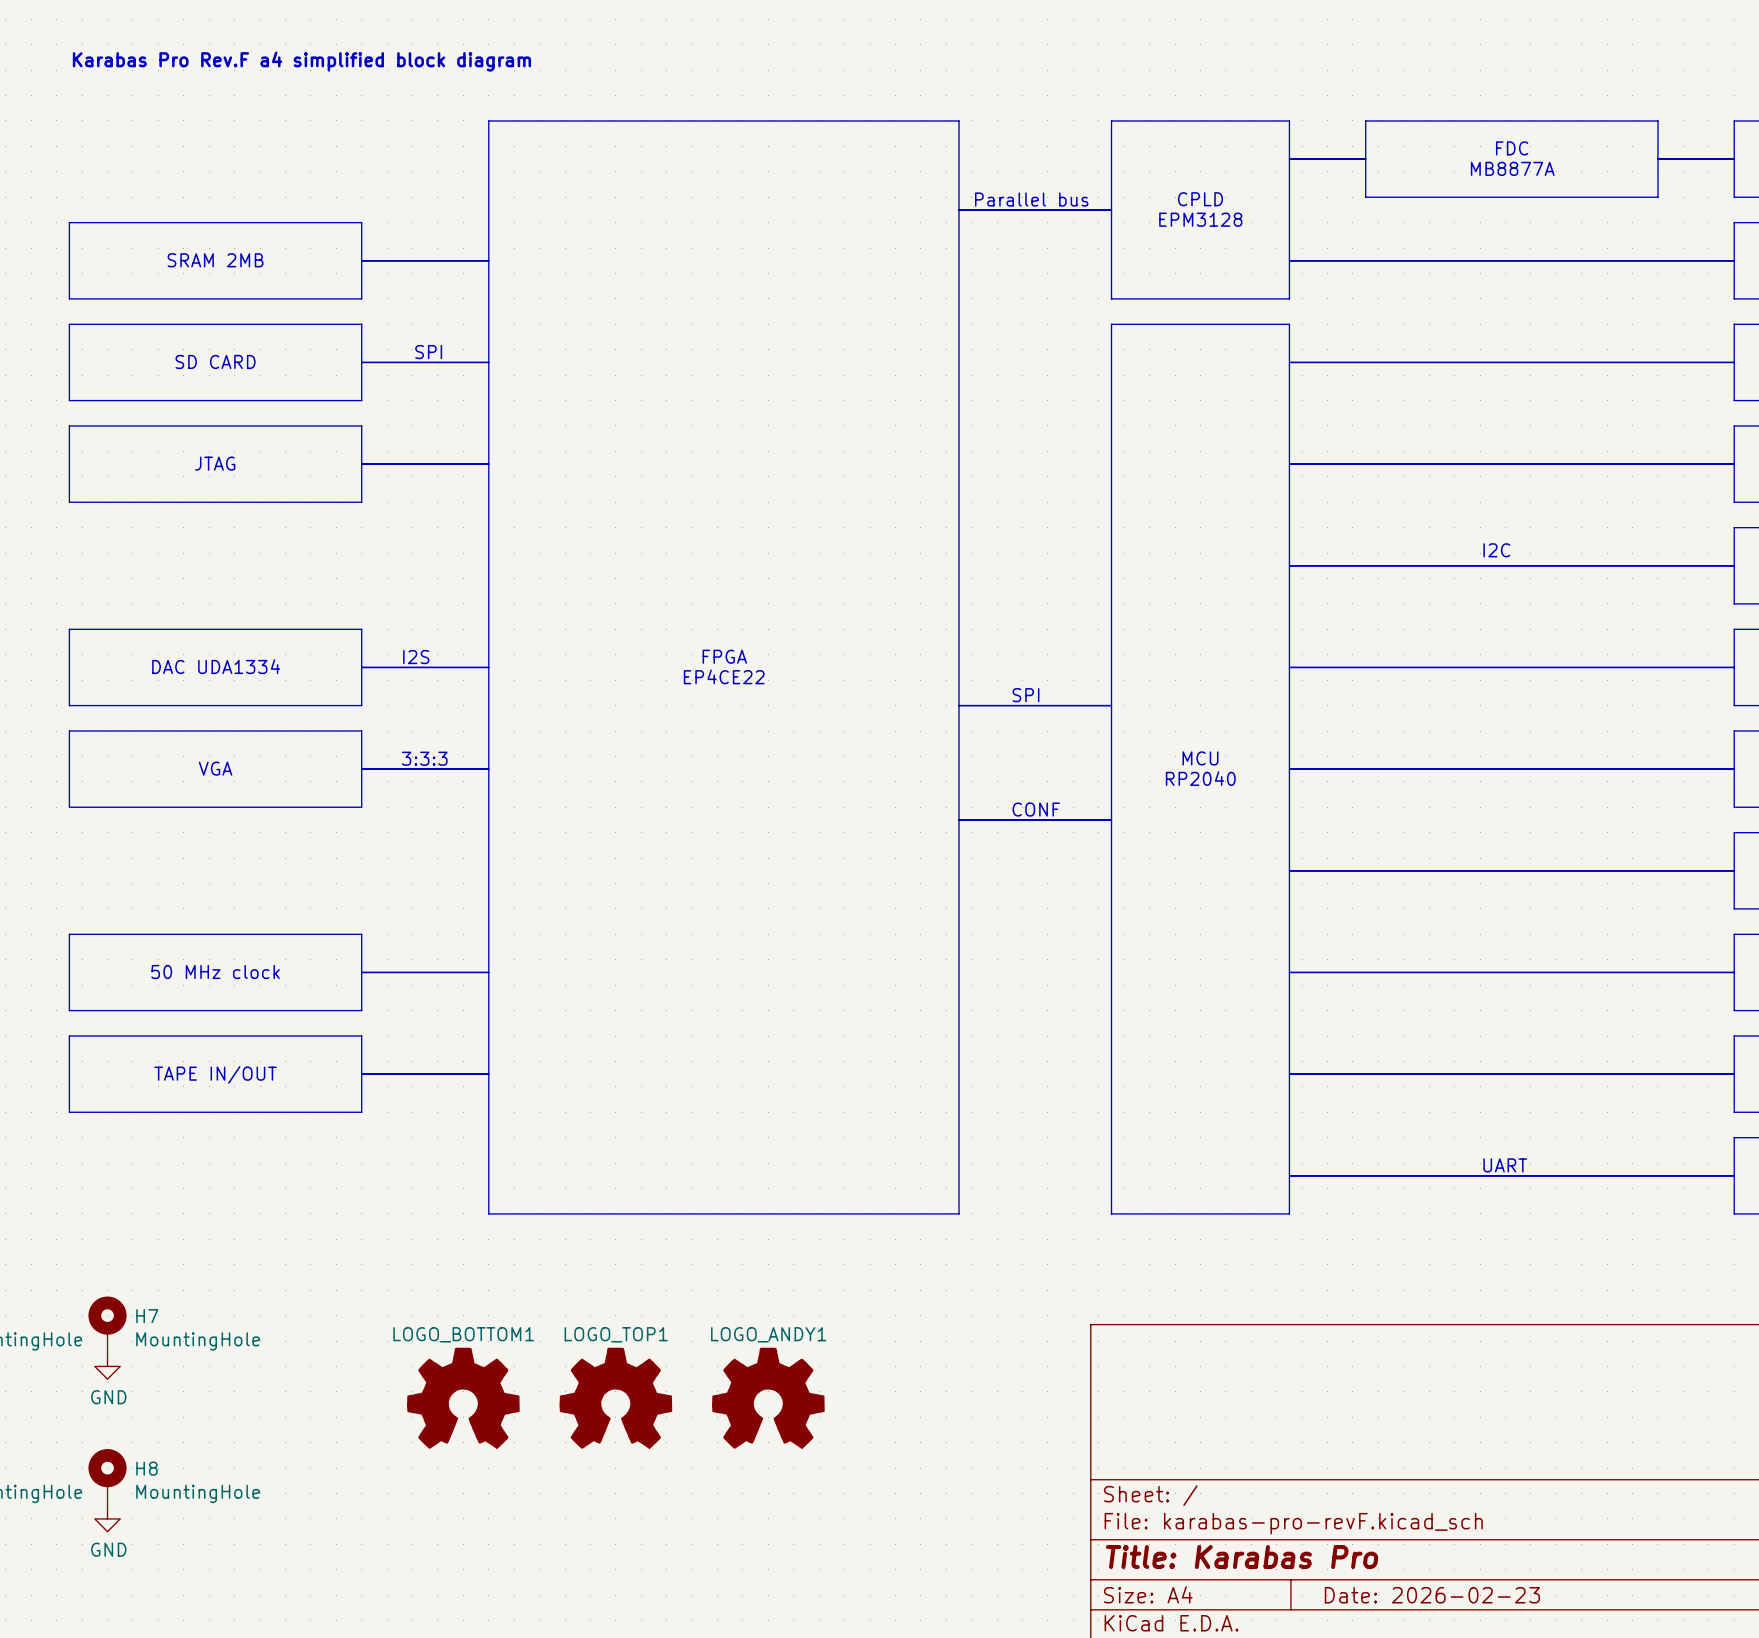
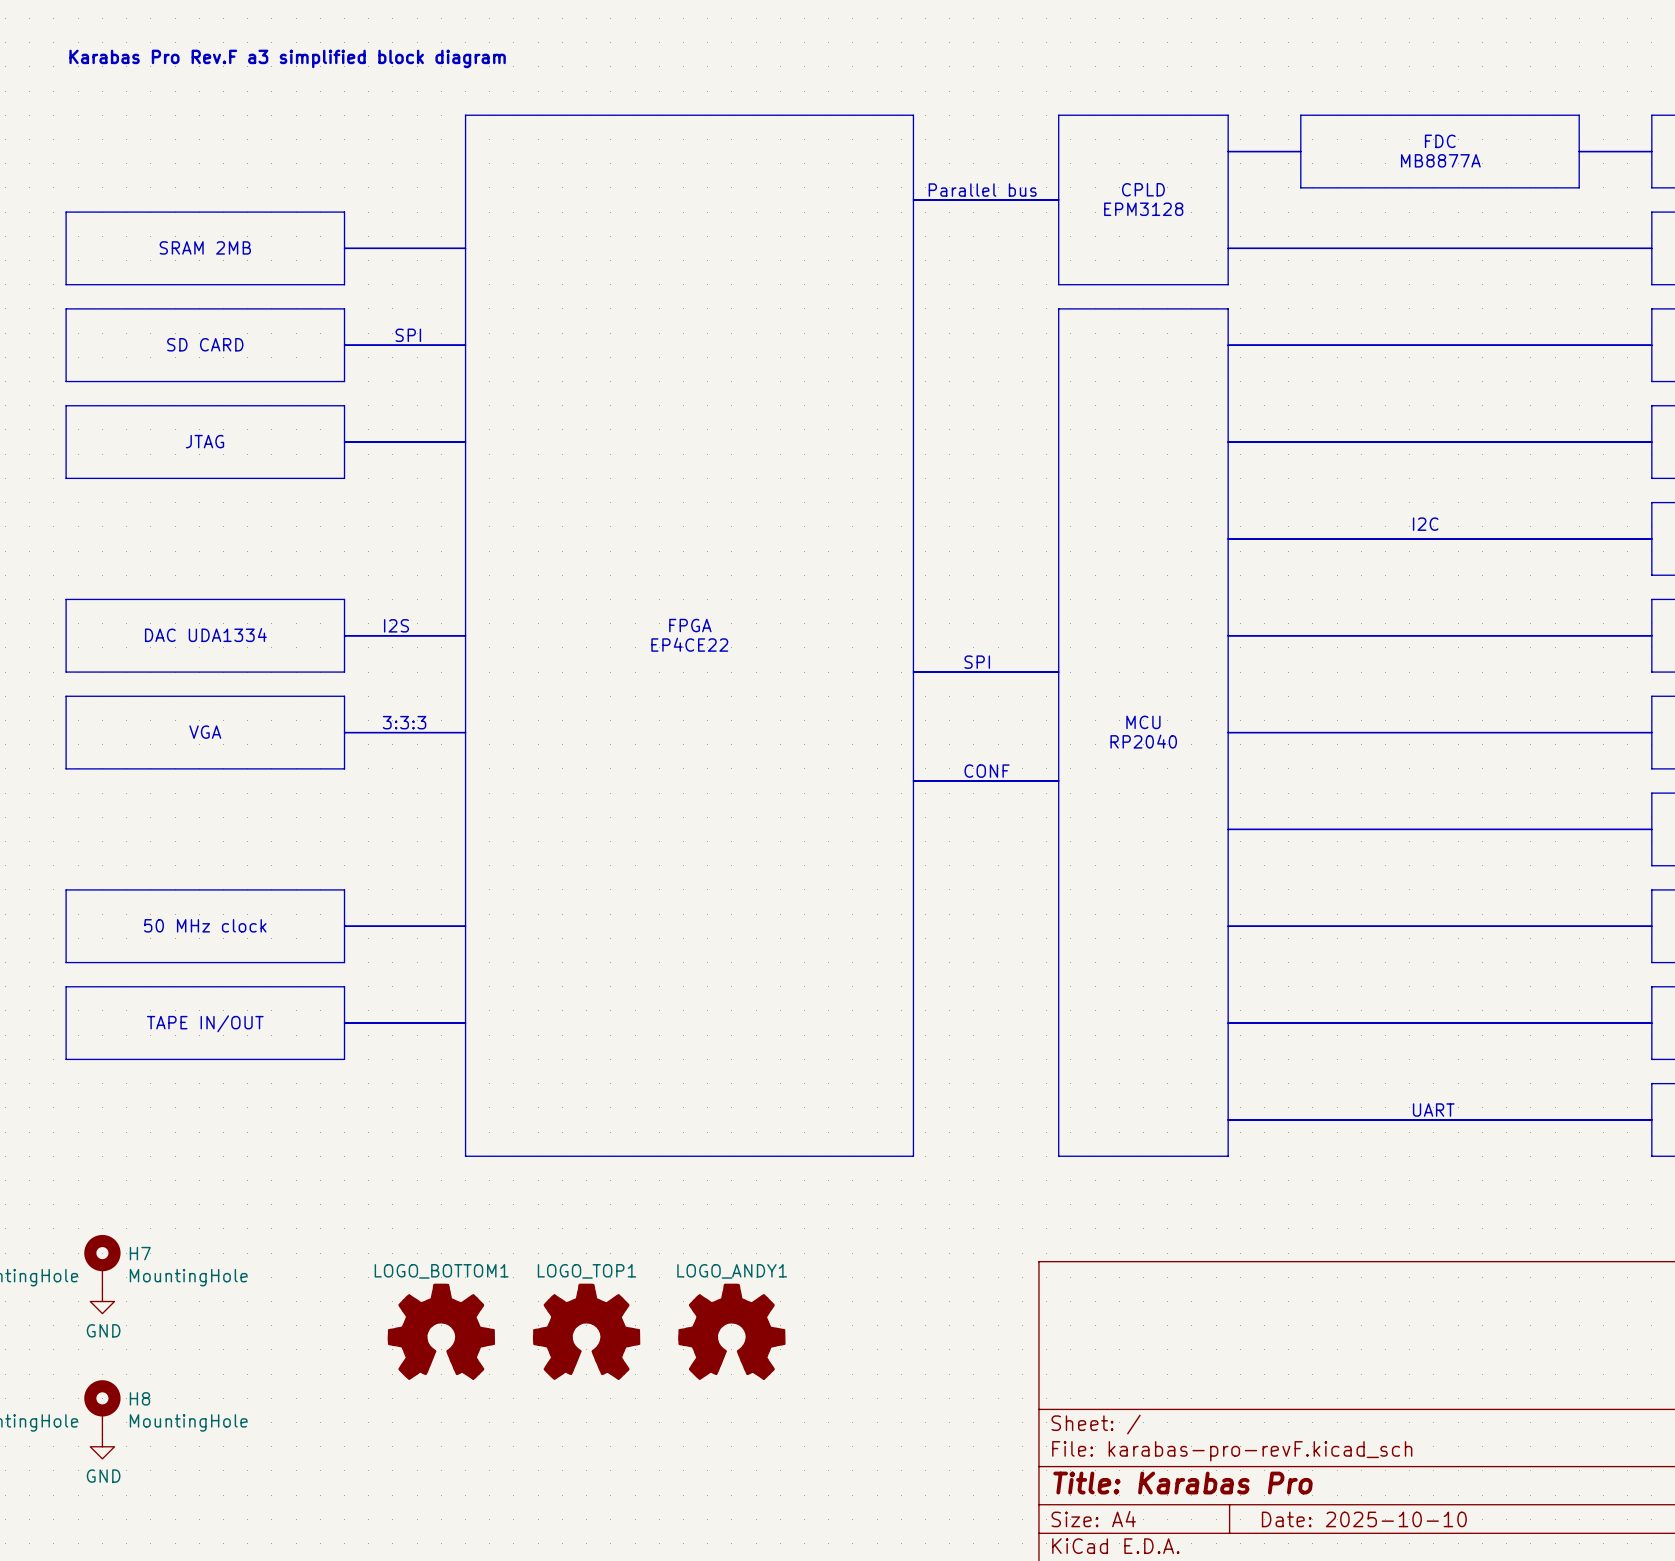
text: Karabas Pro Rev.F a4 simplified block diagram (301, 61) -> Karabas Pro Rev.F a3 simplified block diagram (287, 58)
title block: Date: 2026-02-23 (1432, 1595) -> Date: 2025-10-10 (1364, 1519)

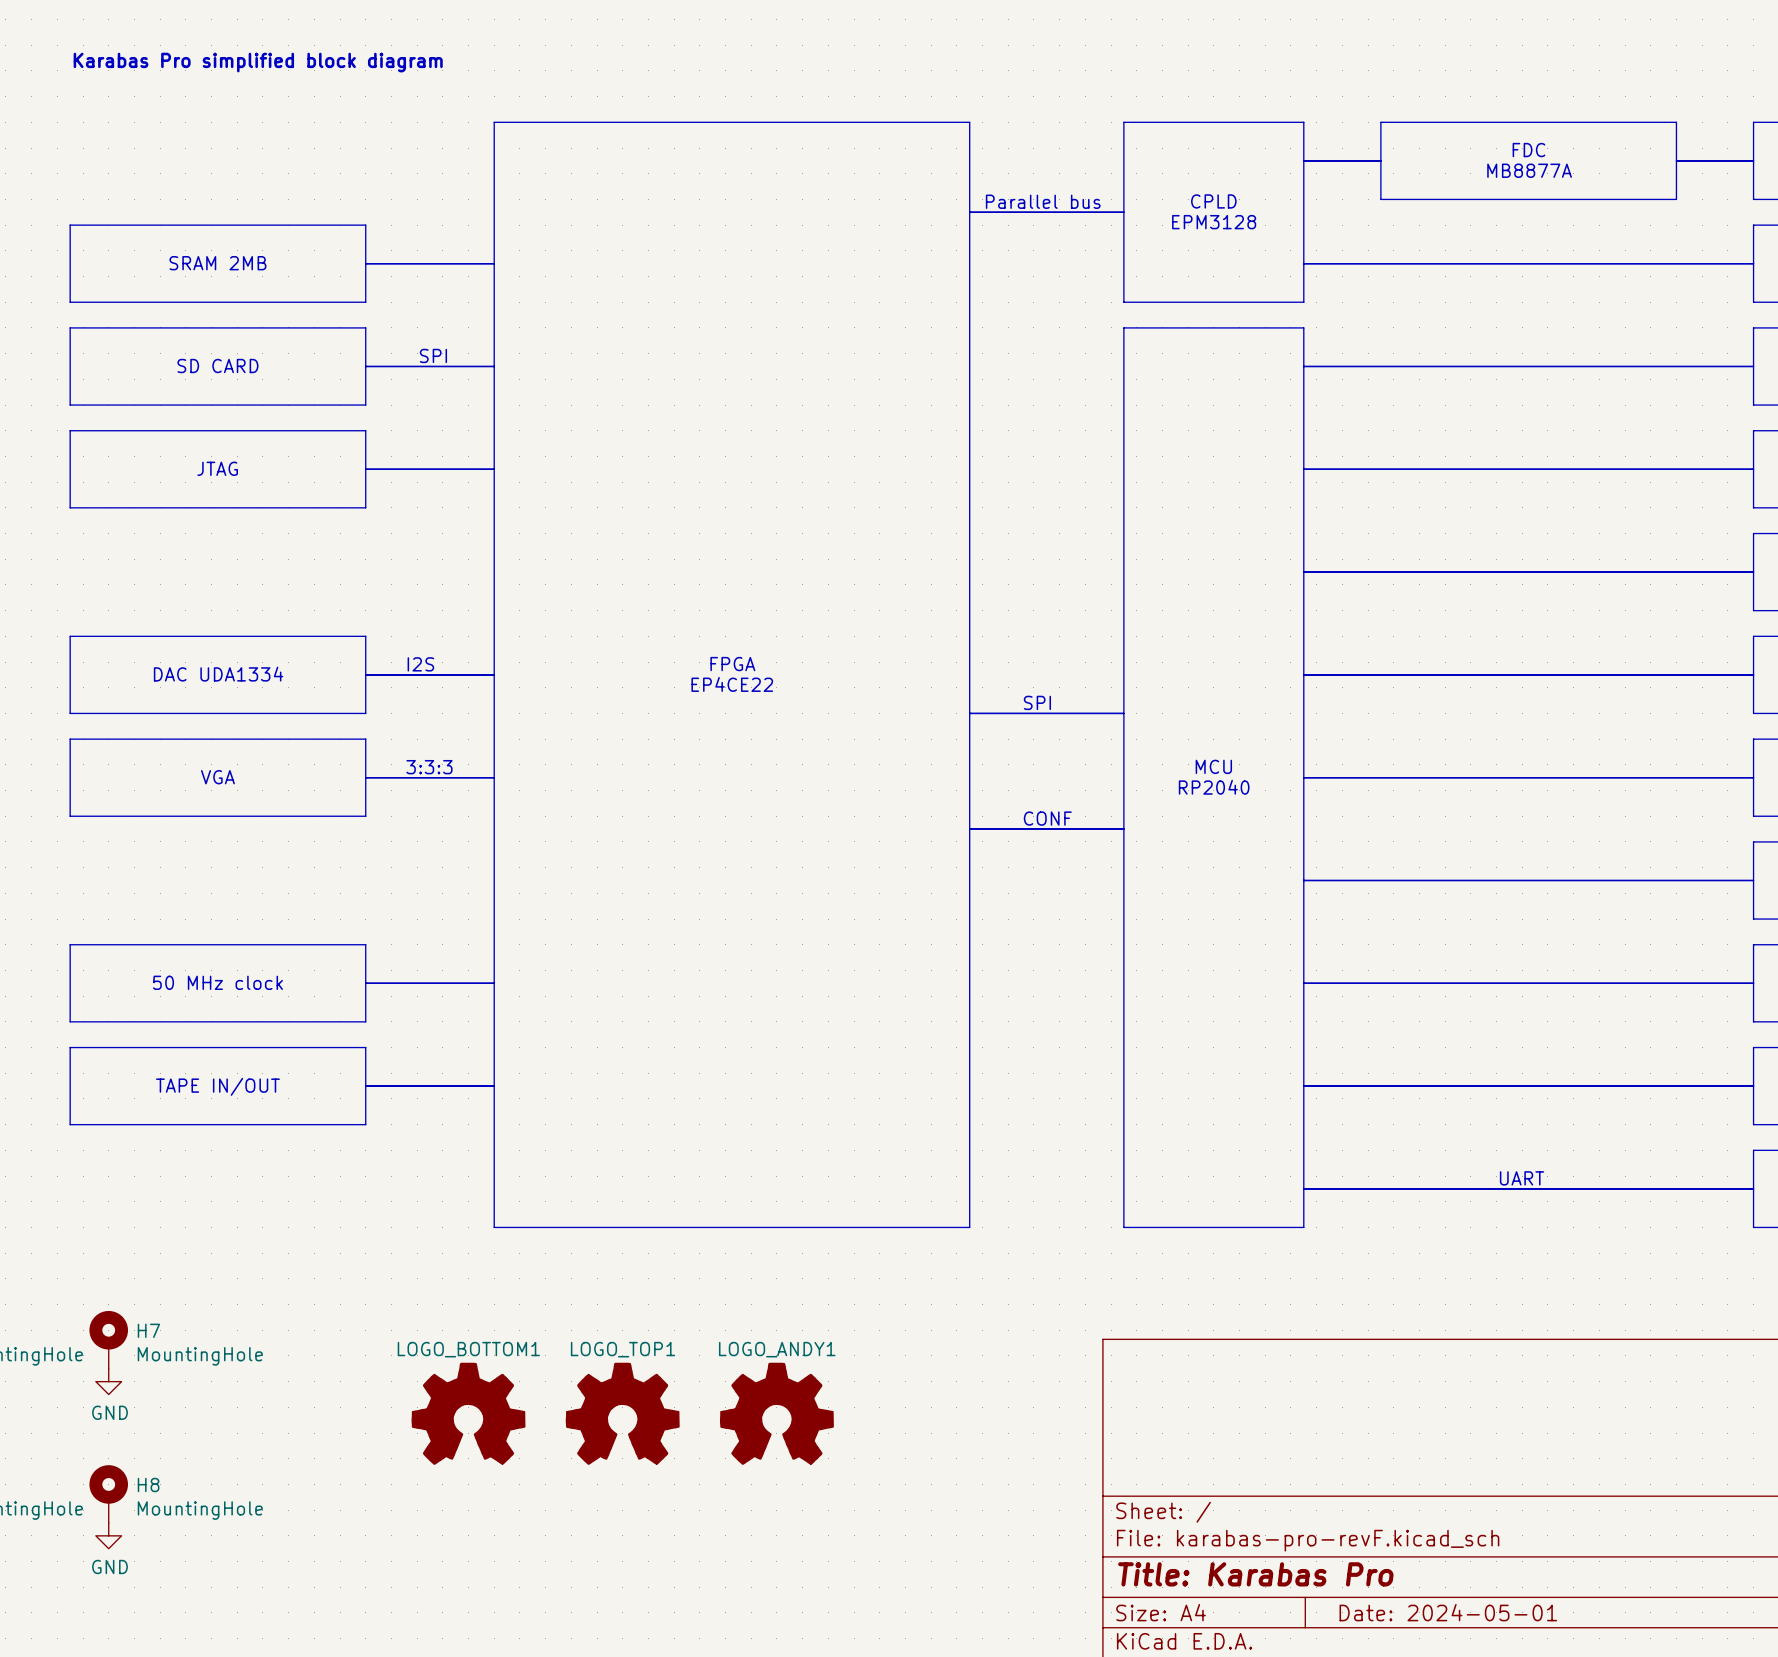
text: Karabas Pro Rev.F a3 simplified block diagram (287, 58) -> Karabas Pro simplified block diagram (258, 62)
text: I2C (1425, 524) -> none
title block: Date: 2025-10-10 (1364, 1519) -> Date: 2024-05-01 (1448, 1612)

